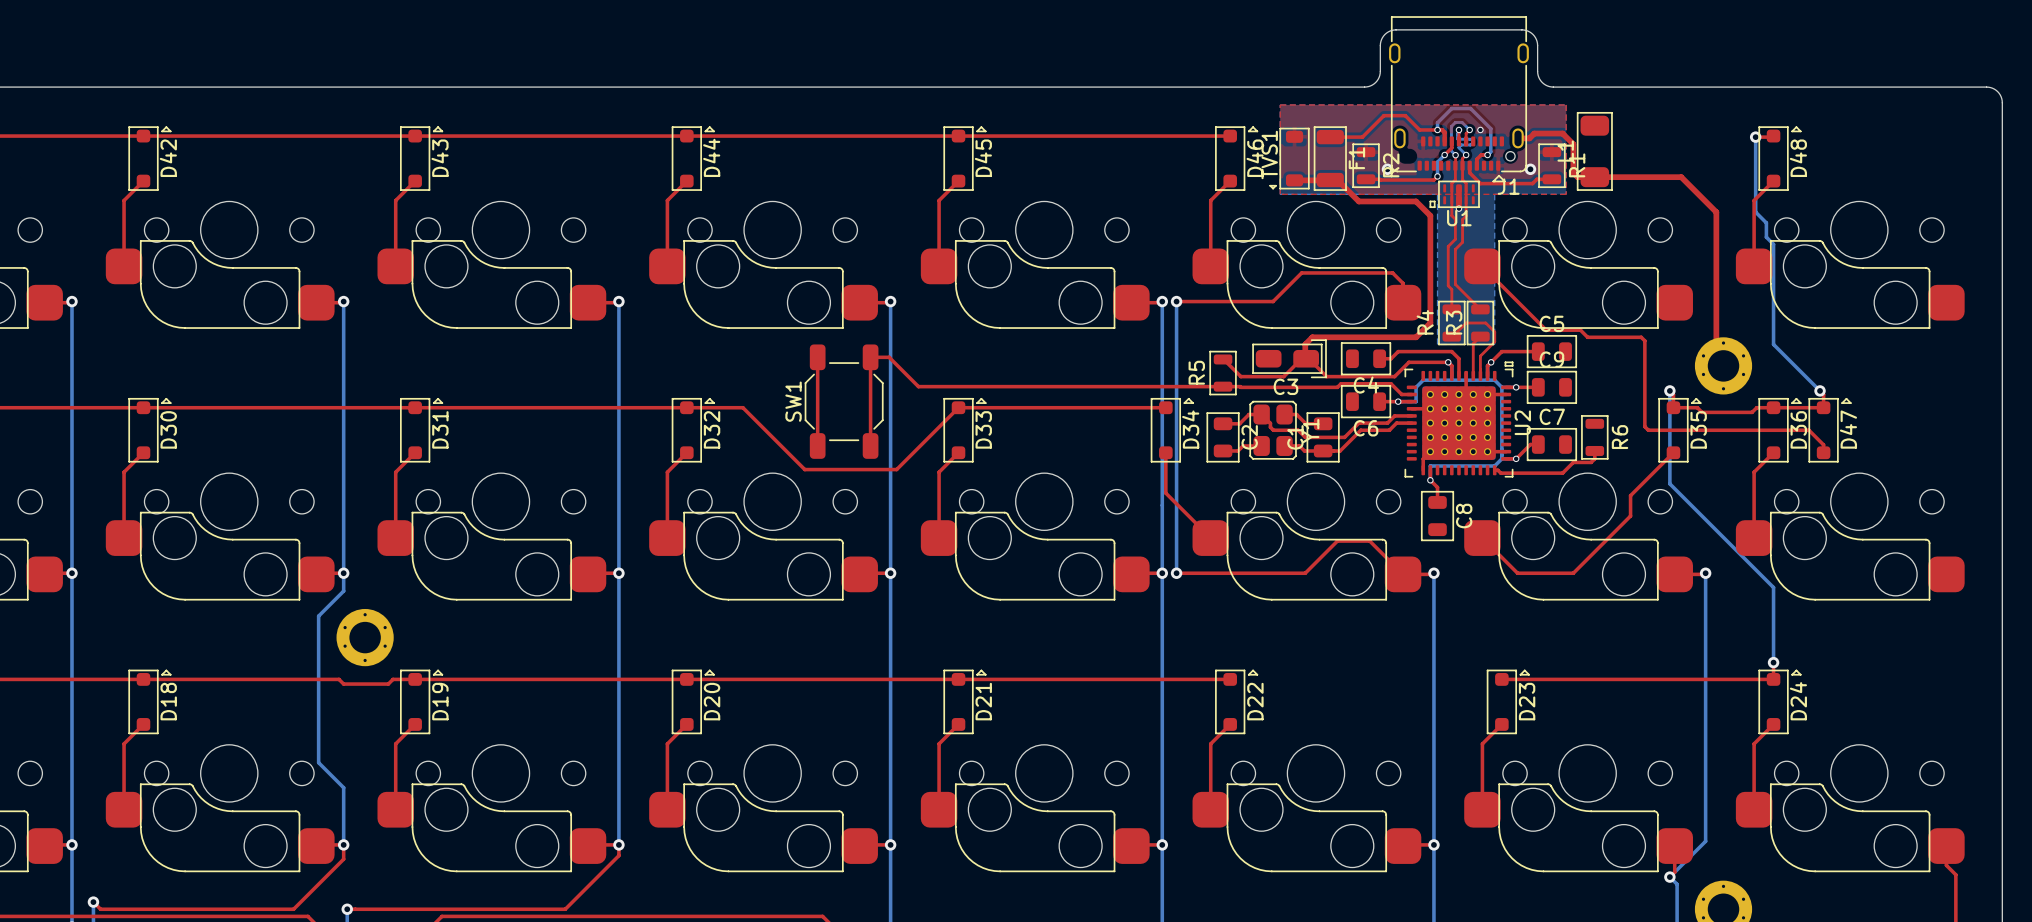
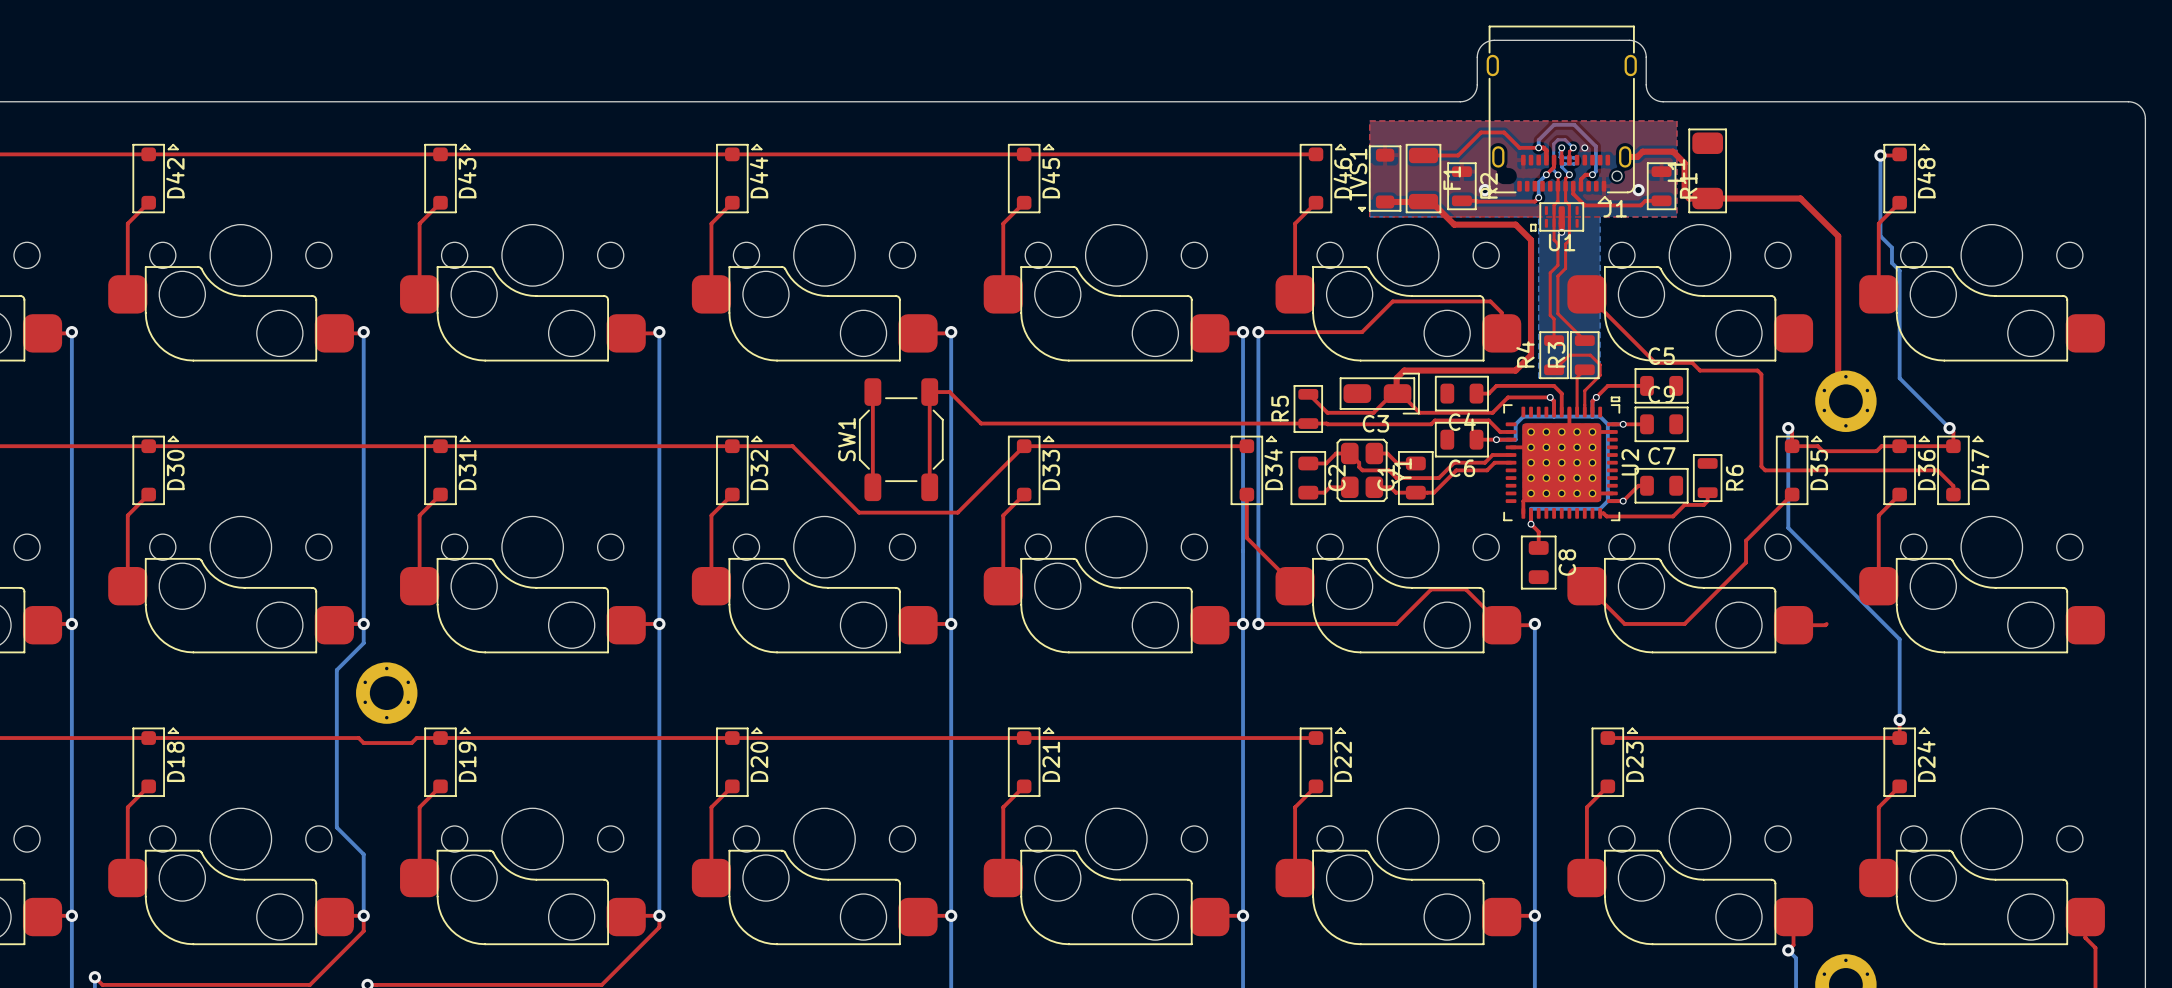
bottom track: (1705, 573) (1705, 841) (1669, 877) -> none
via: (1705, 573) -> none

